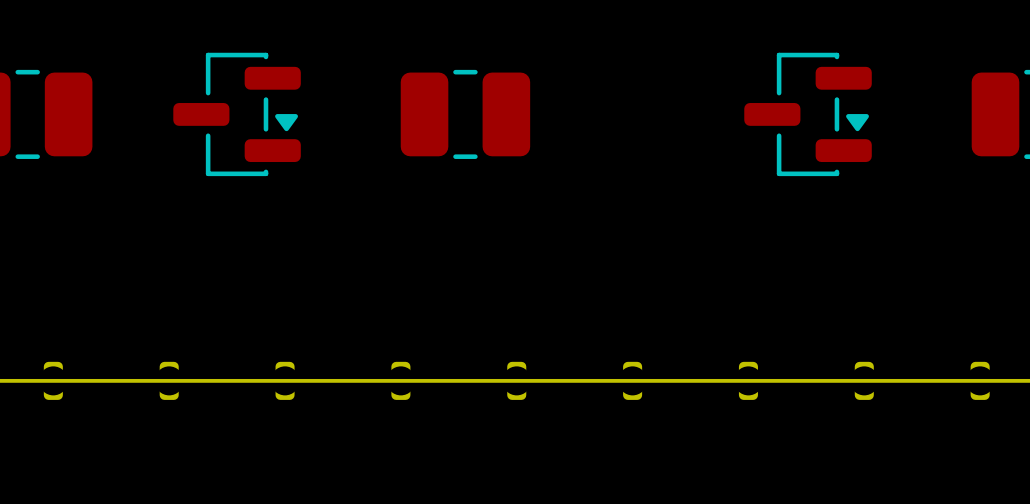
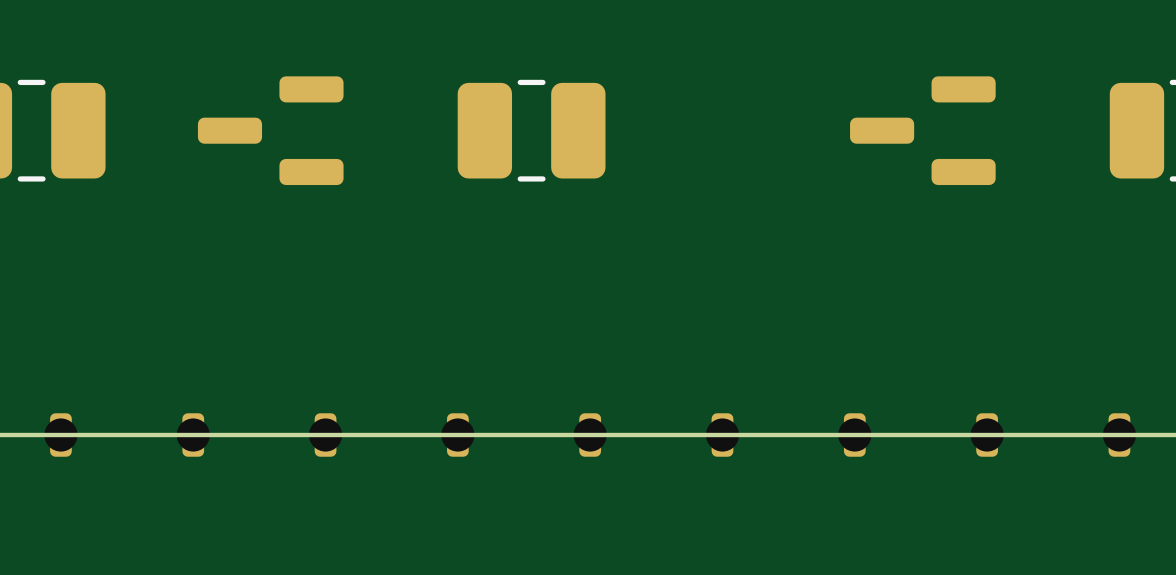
part footprint: [173, 52, 301, 177] -> [197, 76, 344, 186]
part footprint: [744, 52, 872, 177] -> [850, 76, 996, 186]

